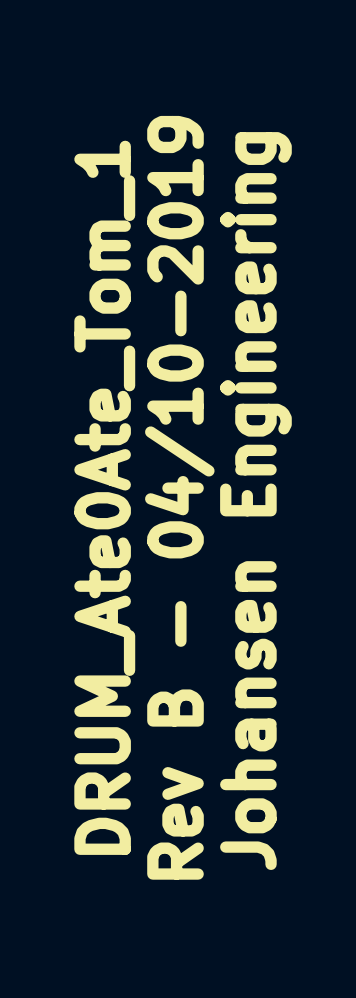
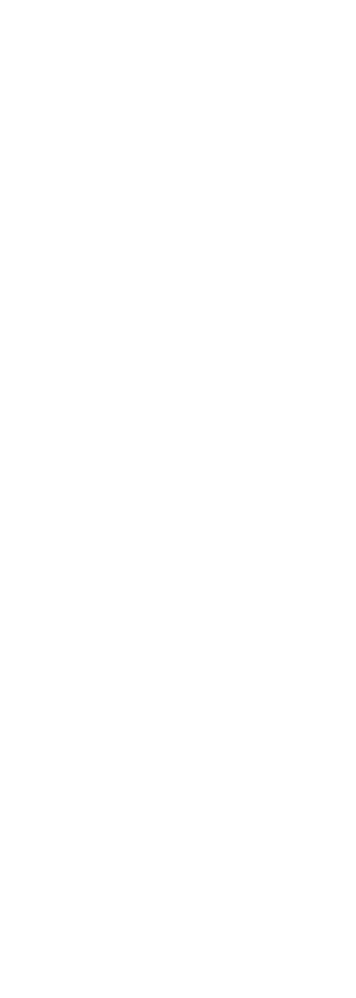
text: DRUM_Ate0Ate_Tom_1 (104, 497) -> none
text: Rev B - 04/10-2019 (179, 497) -> none
text: Johansen Engineering (255, 501) -> none

